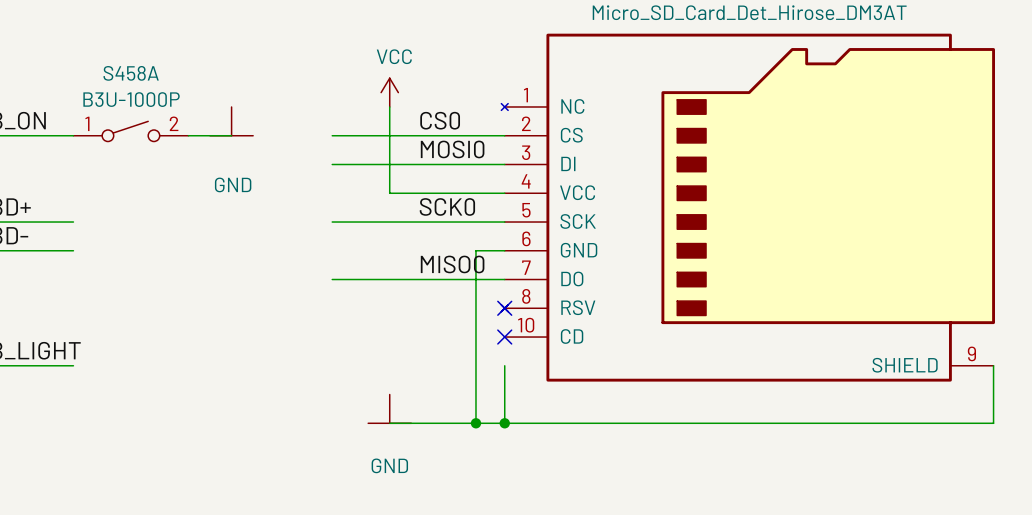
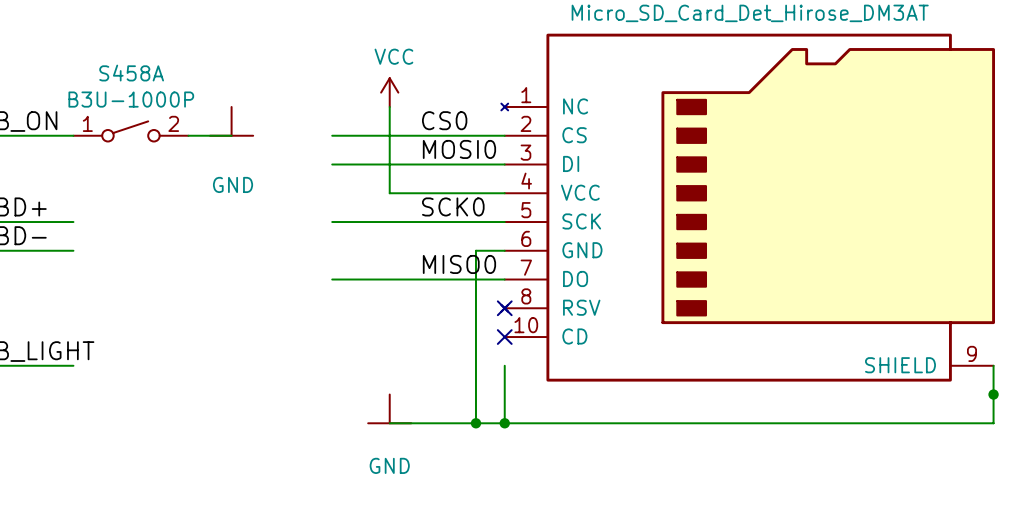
junction: none -> (993, 394)

